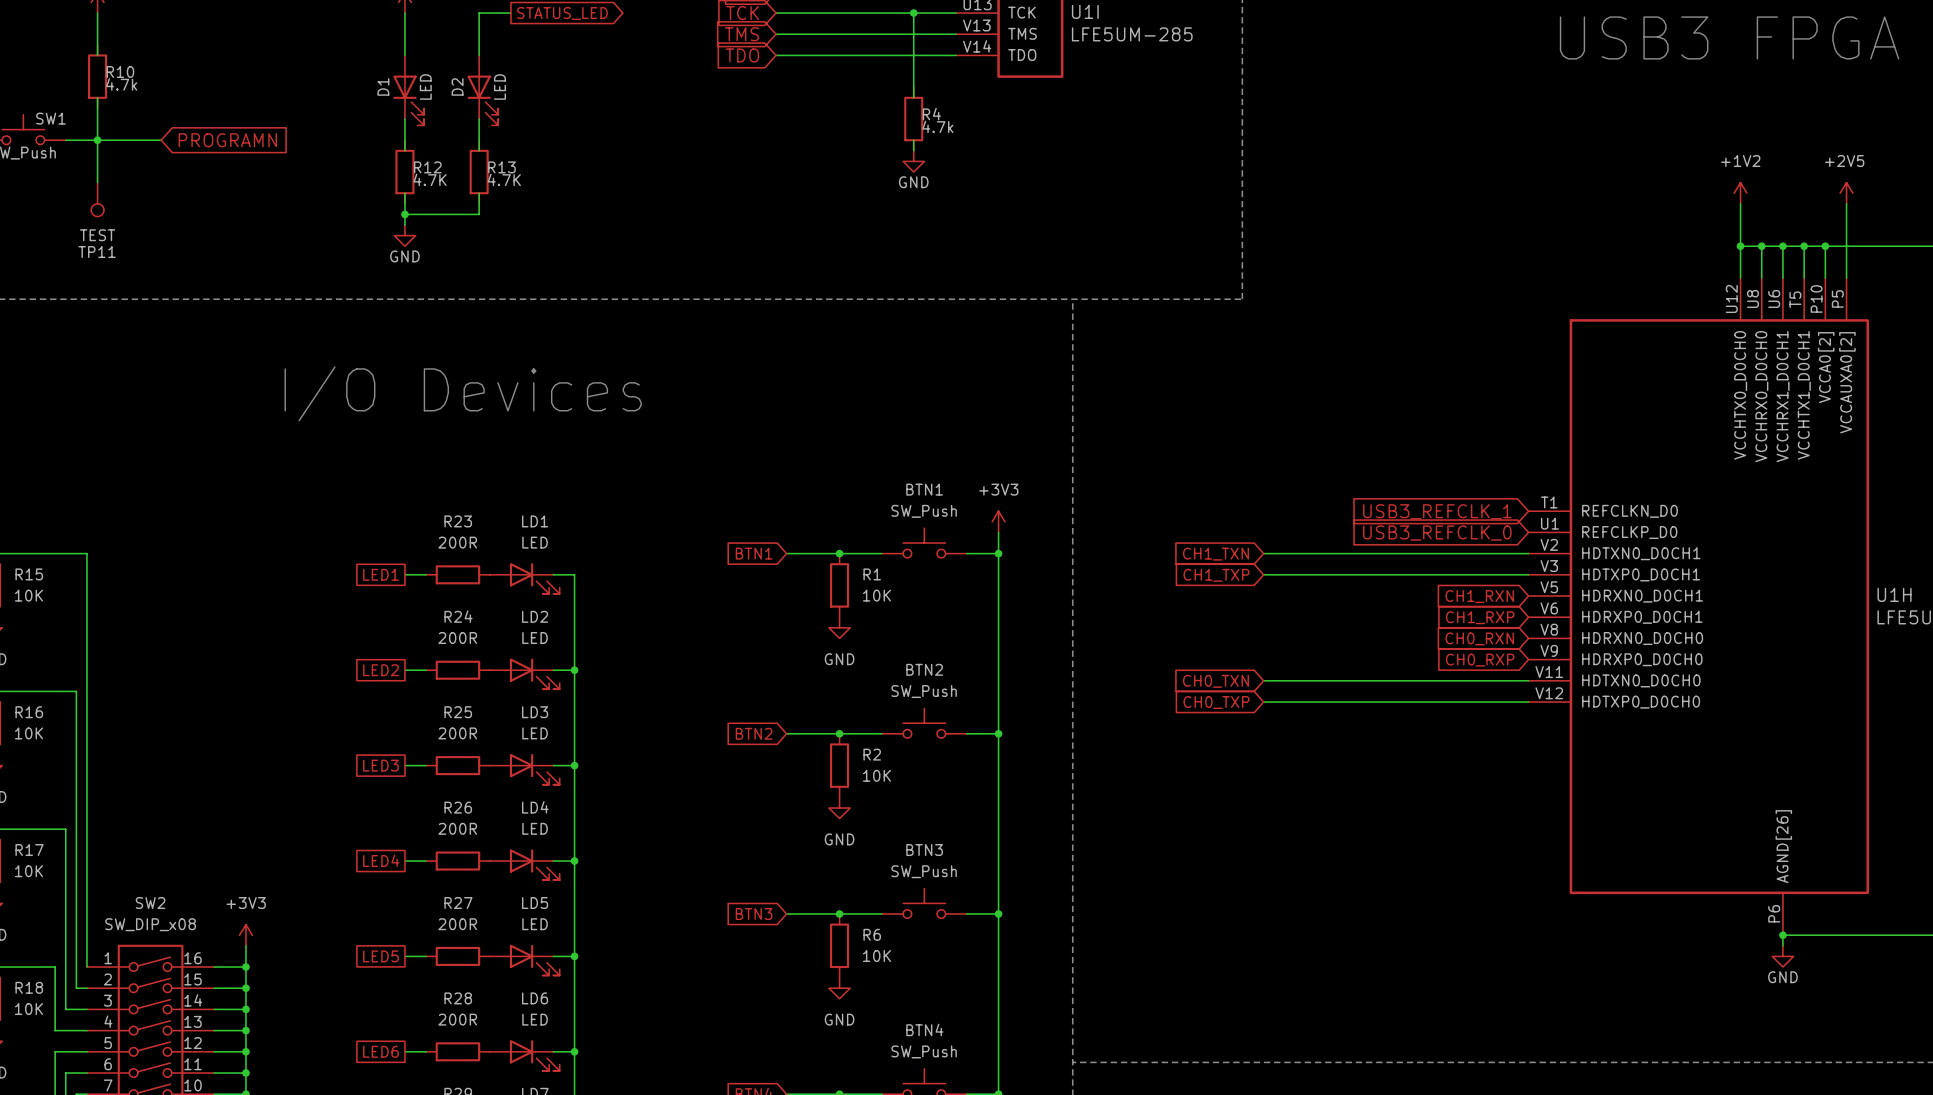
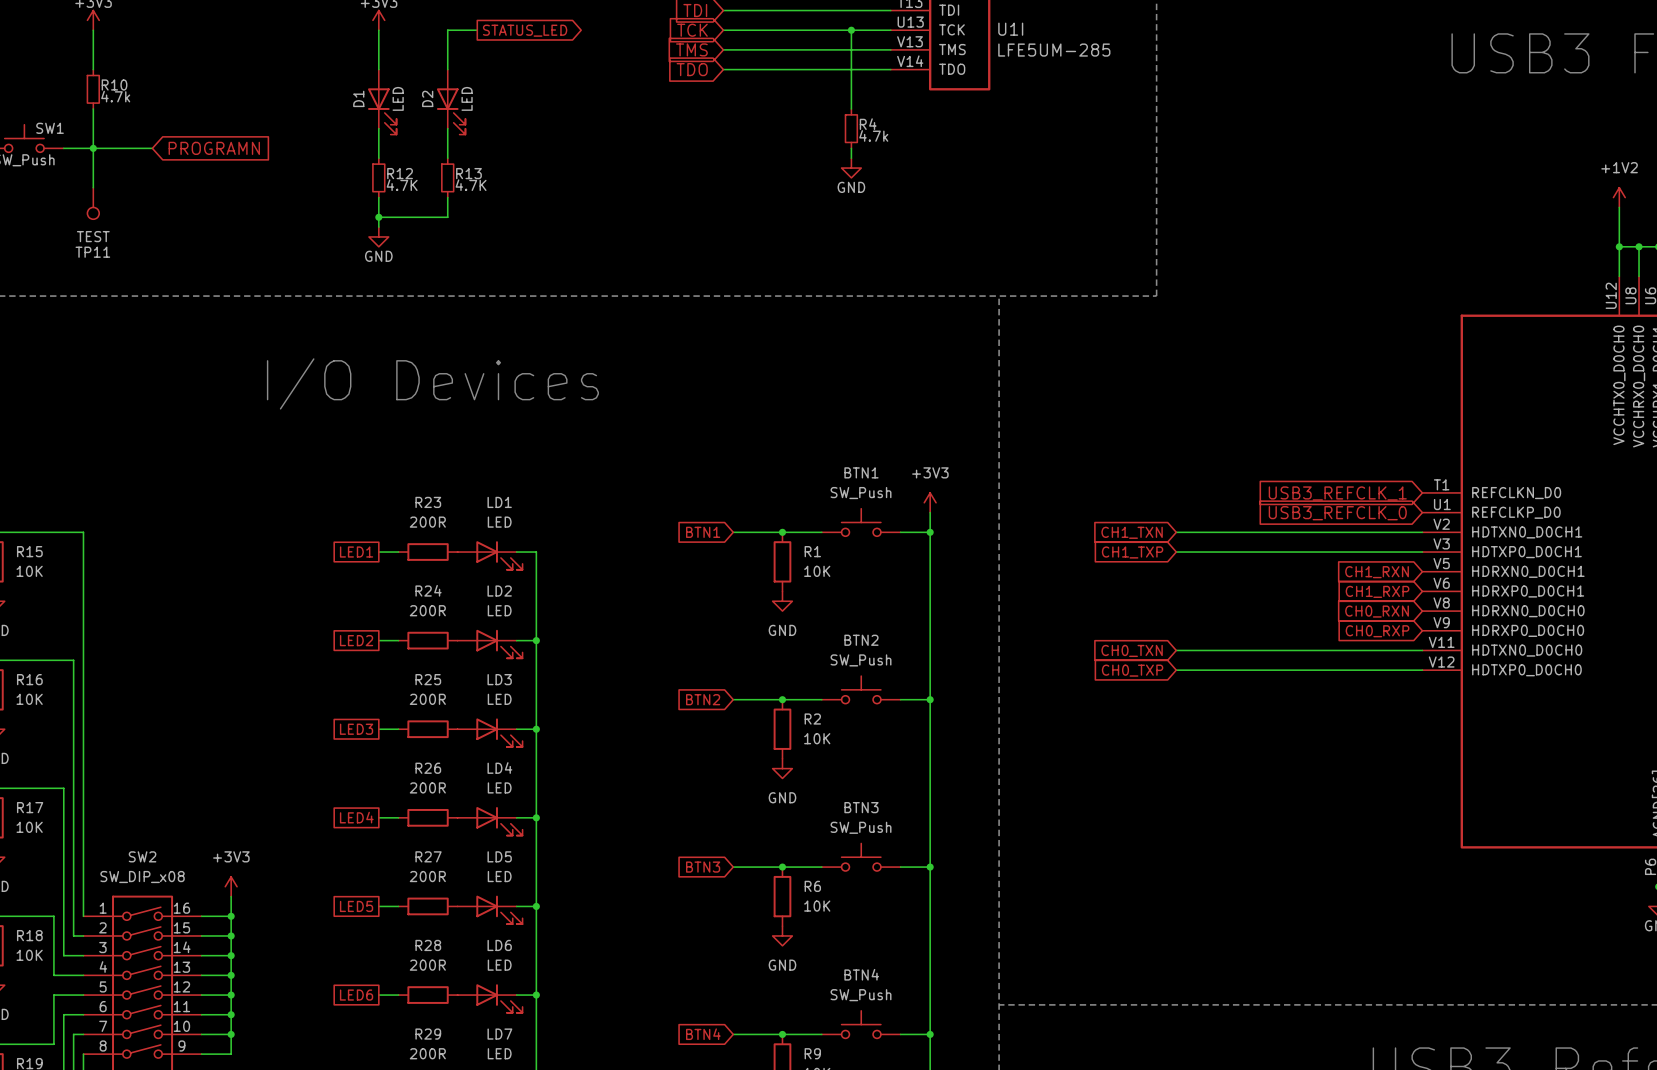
R10 symbol: [88, 44, 108, 109] -> [86, 69, 101, 109]
R4 symbol: [904, 87, 924, 151] -> [844, 108, 859, 149]
R12 symbol: [395, 140, 415, 204] -> [372, 158, 386, 198]
R13 symbol: [469, 140, 489, 204] -> [441, 158, 455, 198]

